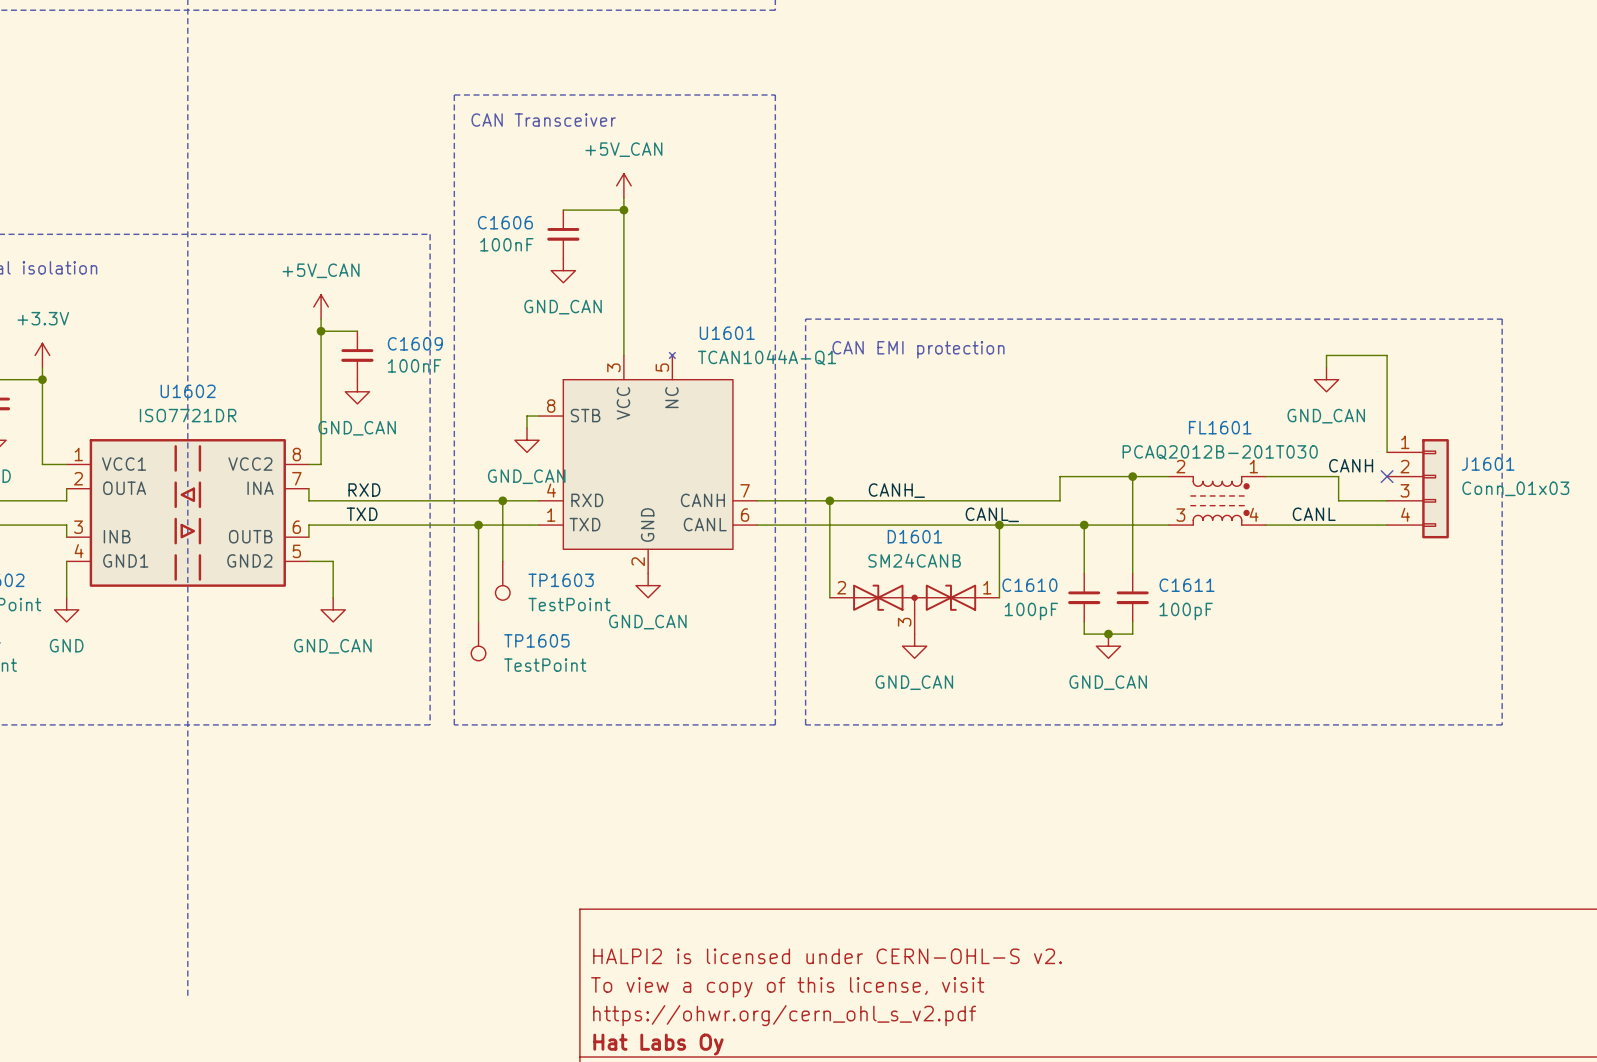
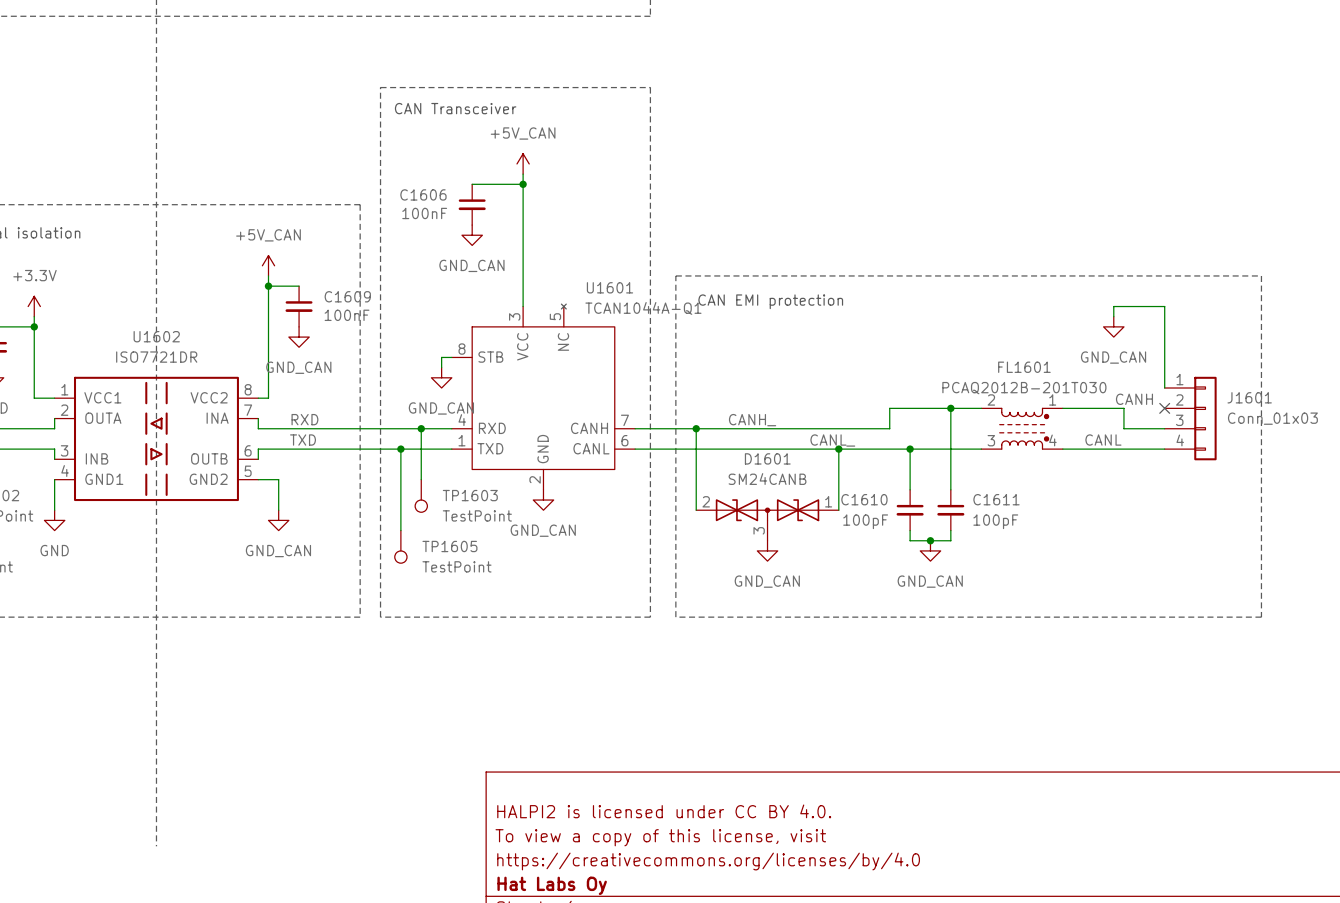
title block: HALPI2 is licensed under CERN-OHL-S v2. (827, 956) -> HALPI2 is licensed under CC BY 4.0. (664, 811)
title block: https://ohwr.org/cern_ohl_s_v2.pdf (784, 1015) -> https://creativecommons.org/licenses/by/4.0 (708, 861)

